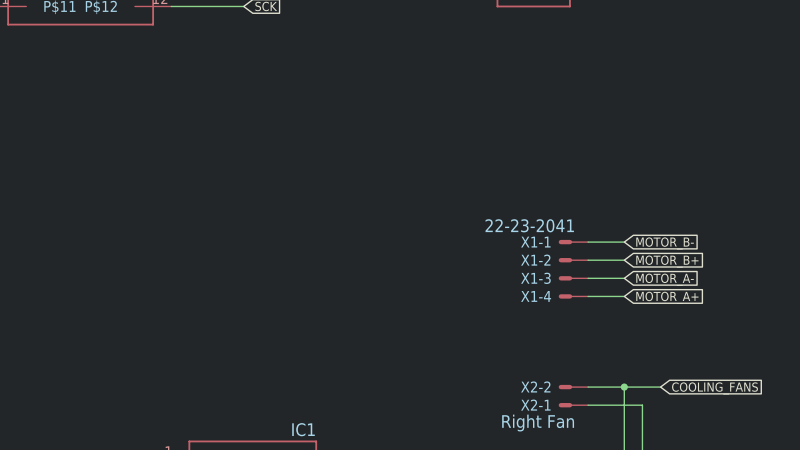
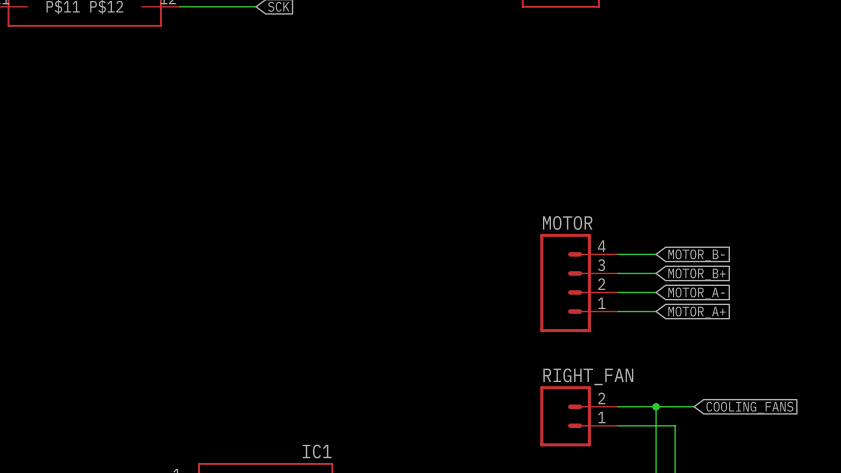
X1-1: 22-23-2041 (573, 242) -> none
X1-2: (573, 260) -> none
MOTOR: none -> (579, 282)
X1-3: (573, 278) -> none
X1-4: (573, 296) -> none
X2-2: (573, 387) -> none
RIGHT_FAN: none -> (579, 416)
X2-1: Right Fan (573, 405) -> none

